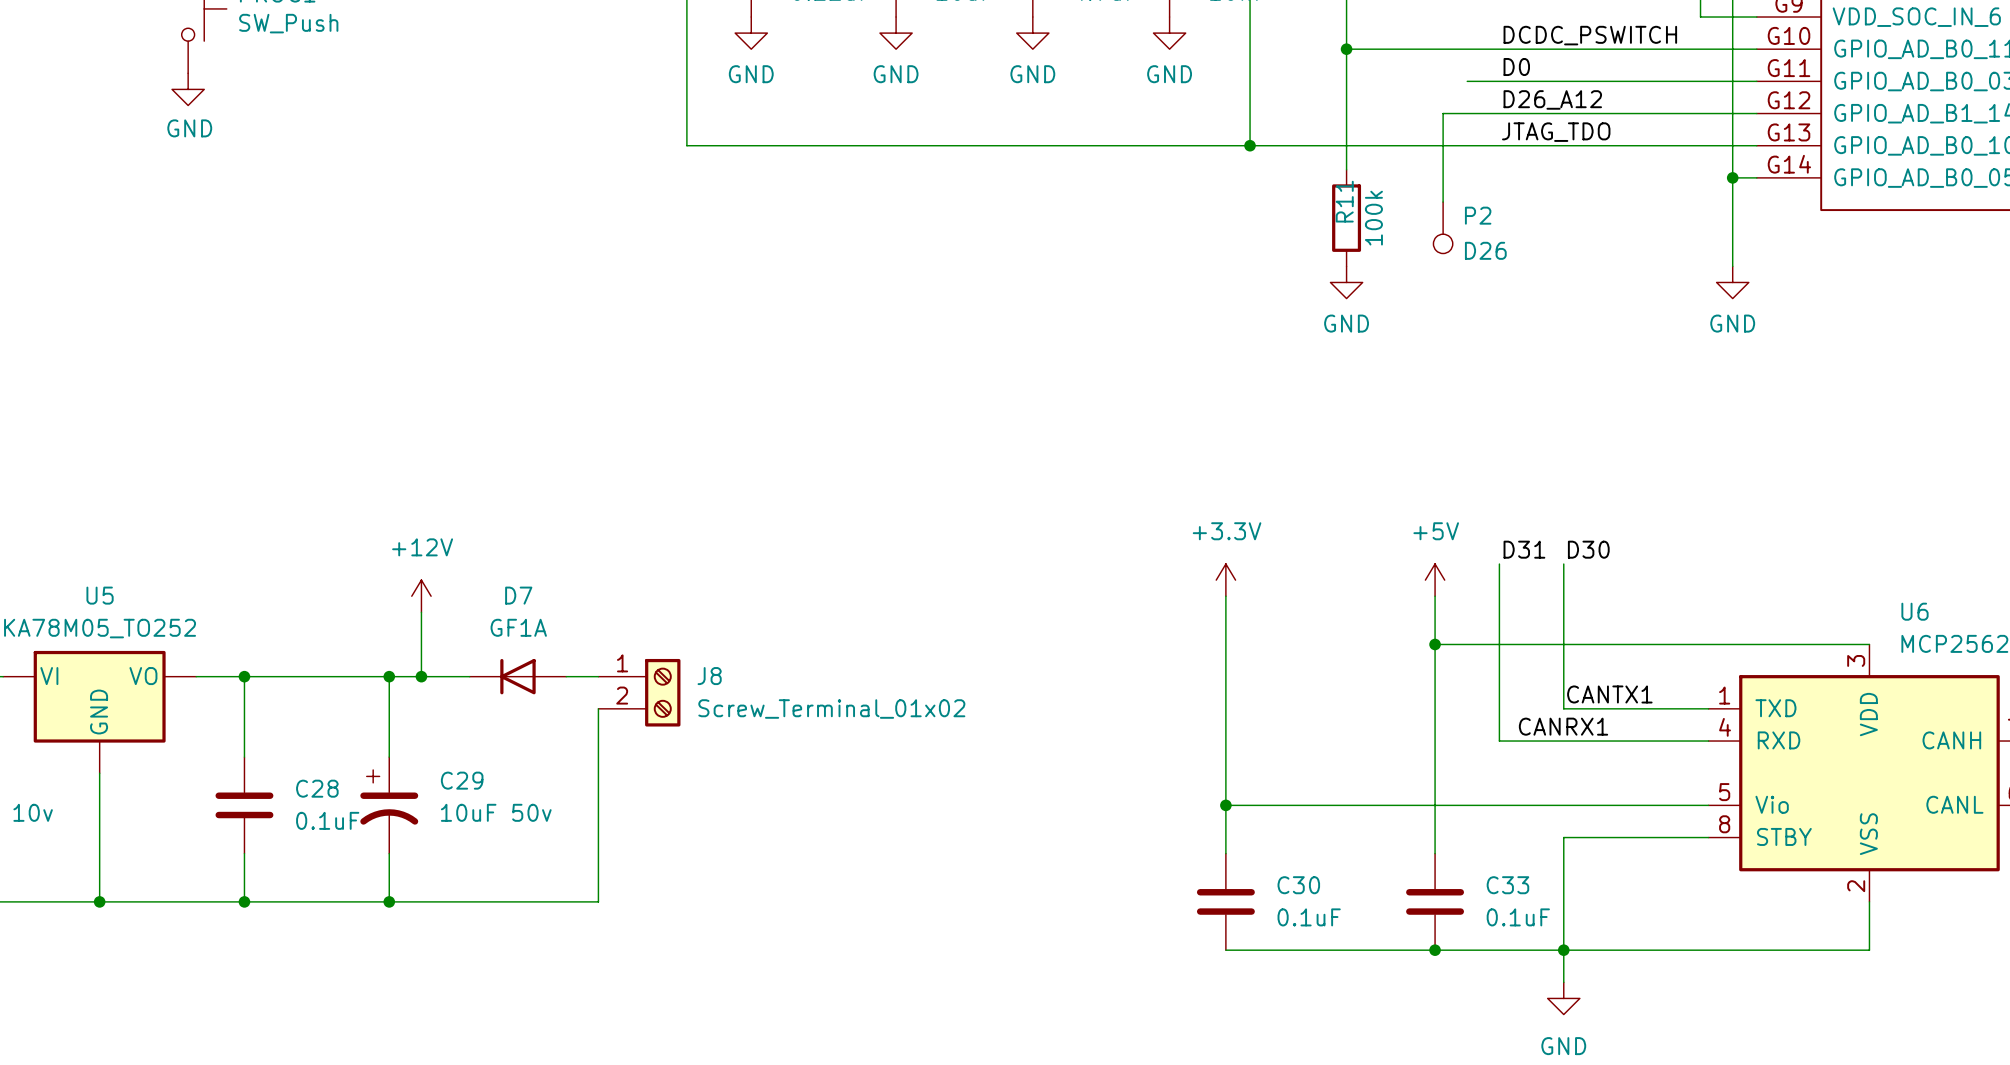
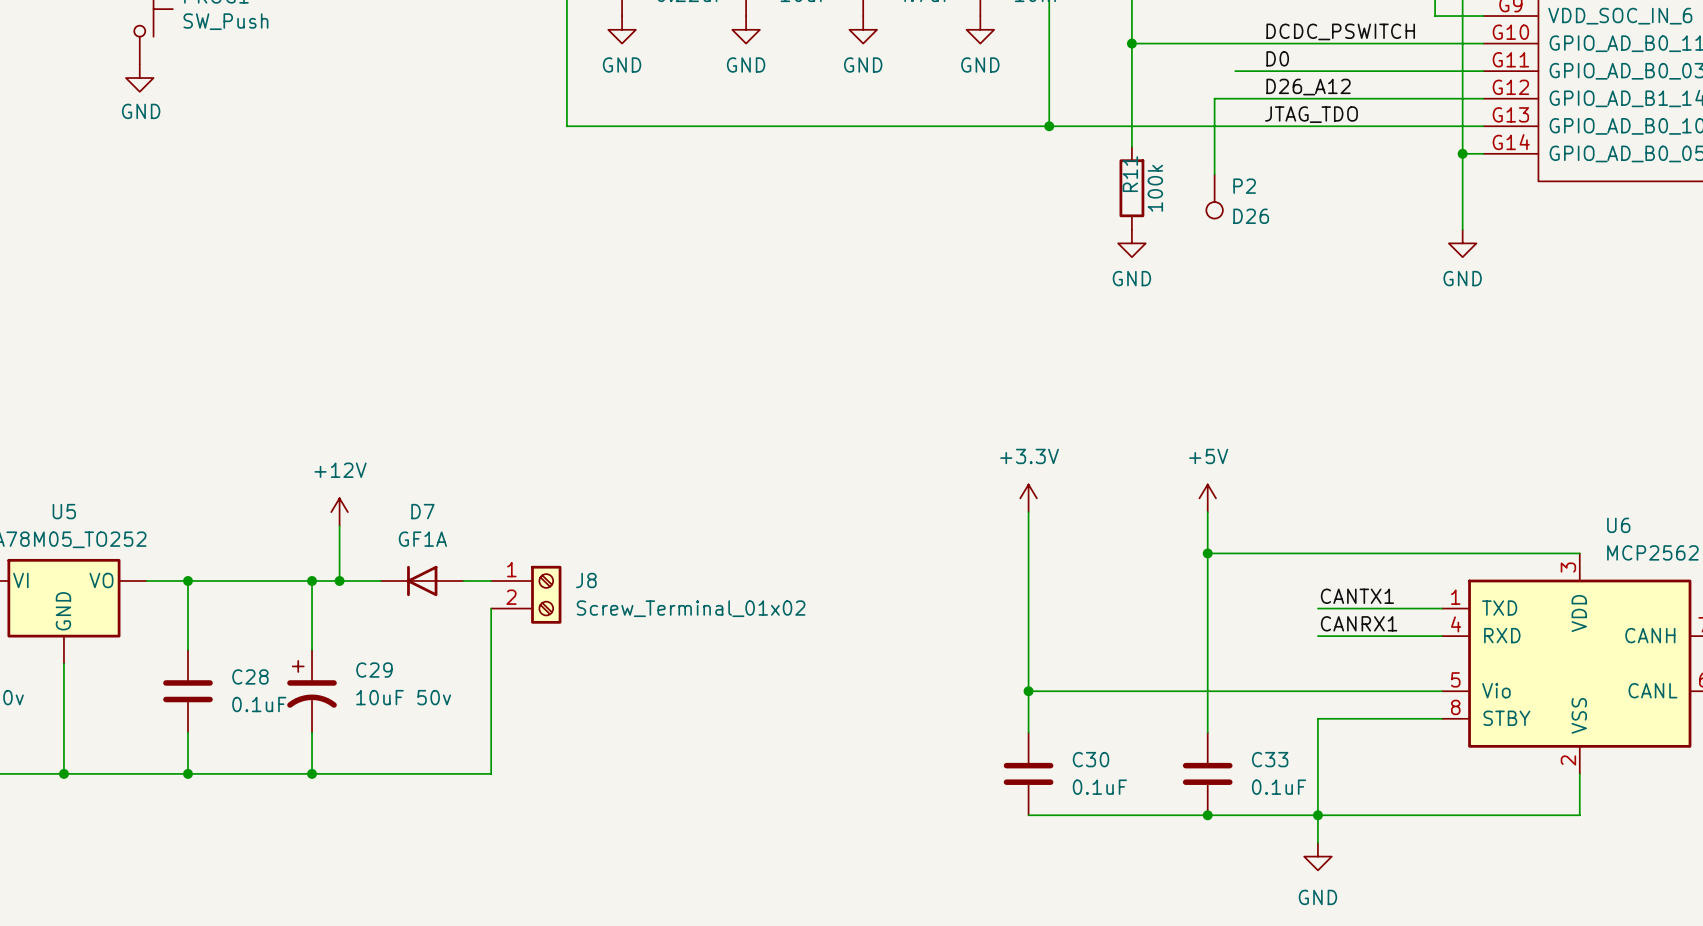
label: D31 (1524, 549) -> none
label: D30 (1588, 549) -> none
wire: (1499, 564) (1499, 741) (1563, 741) -> none
wire: (1563, 564) (1563, 708) -> none
label position: CANRX1 (1563, 726) -> CANRX1 (1359, 623)

